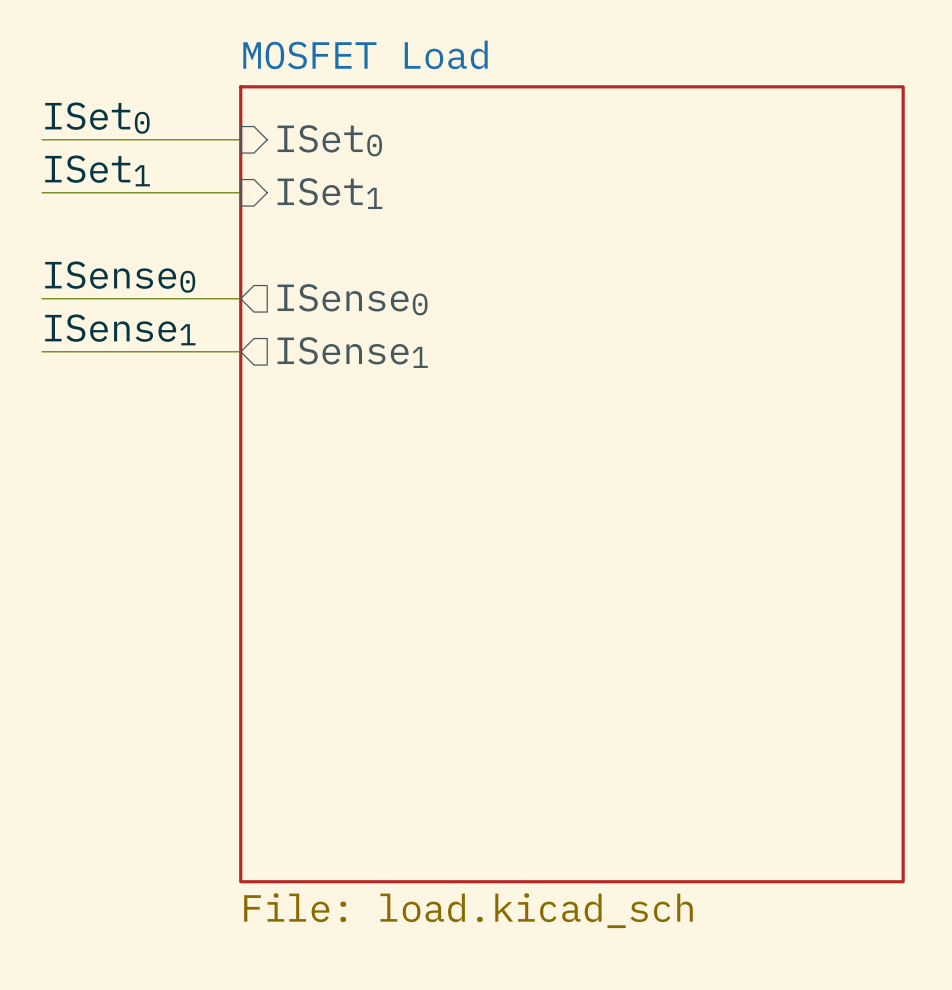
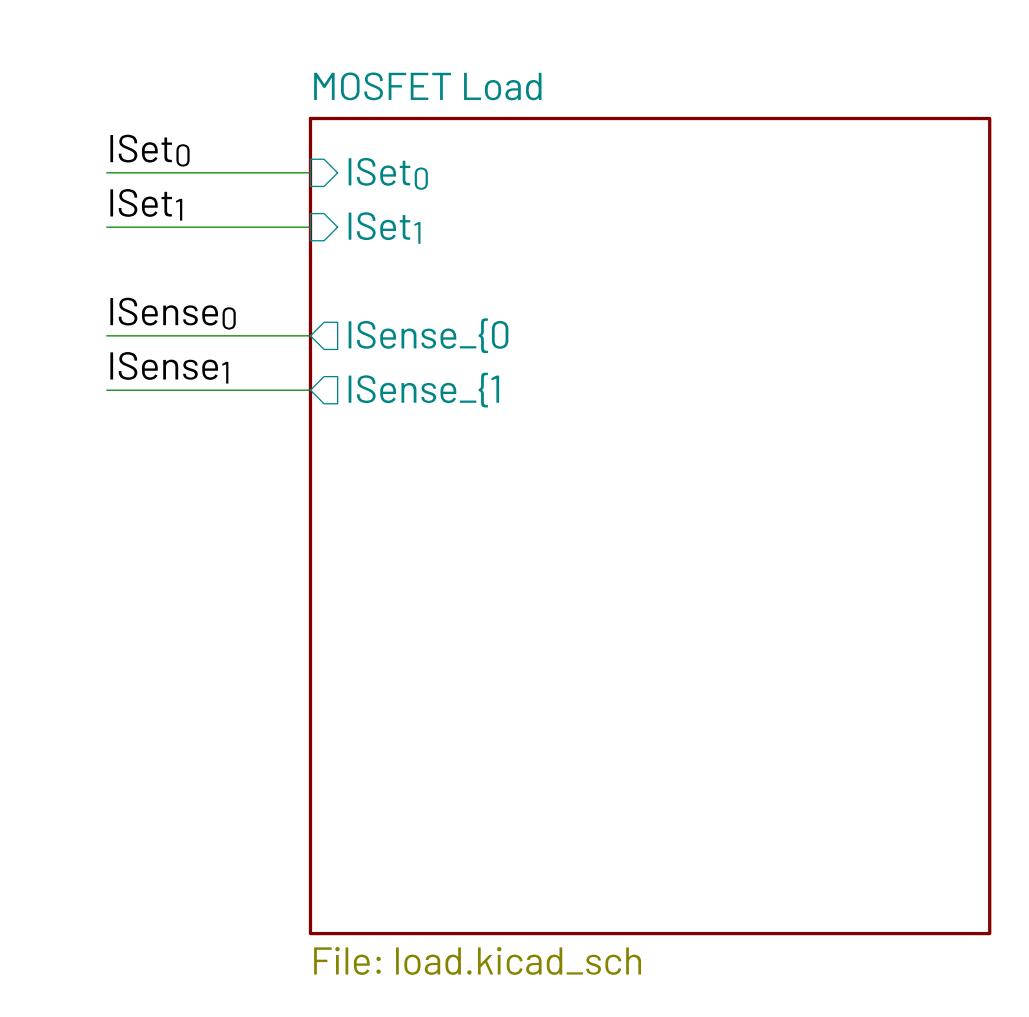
sheet pin: ISense0 (352, 299) -> ISense_{0 (428, 335)
sheet pin: ISense1 (352, 352) -> ISense_{1 (423, 390)

